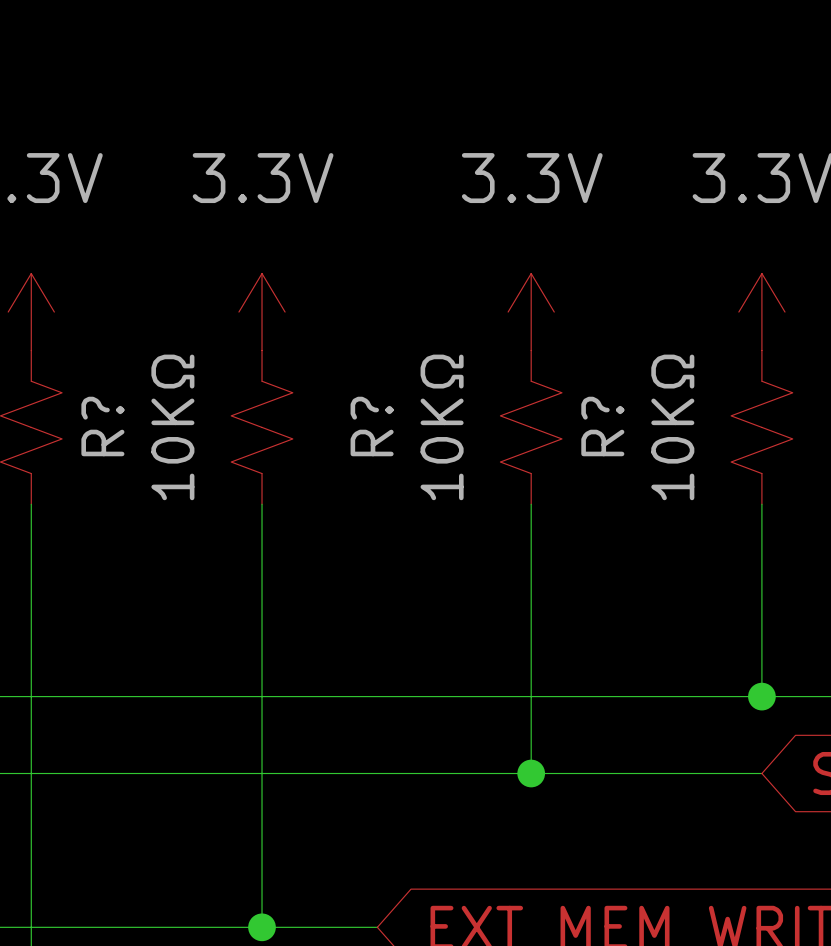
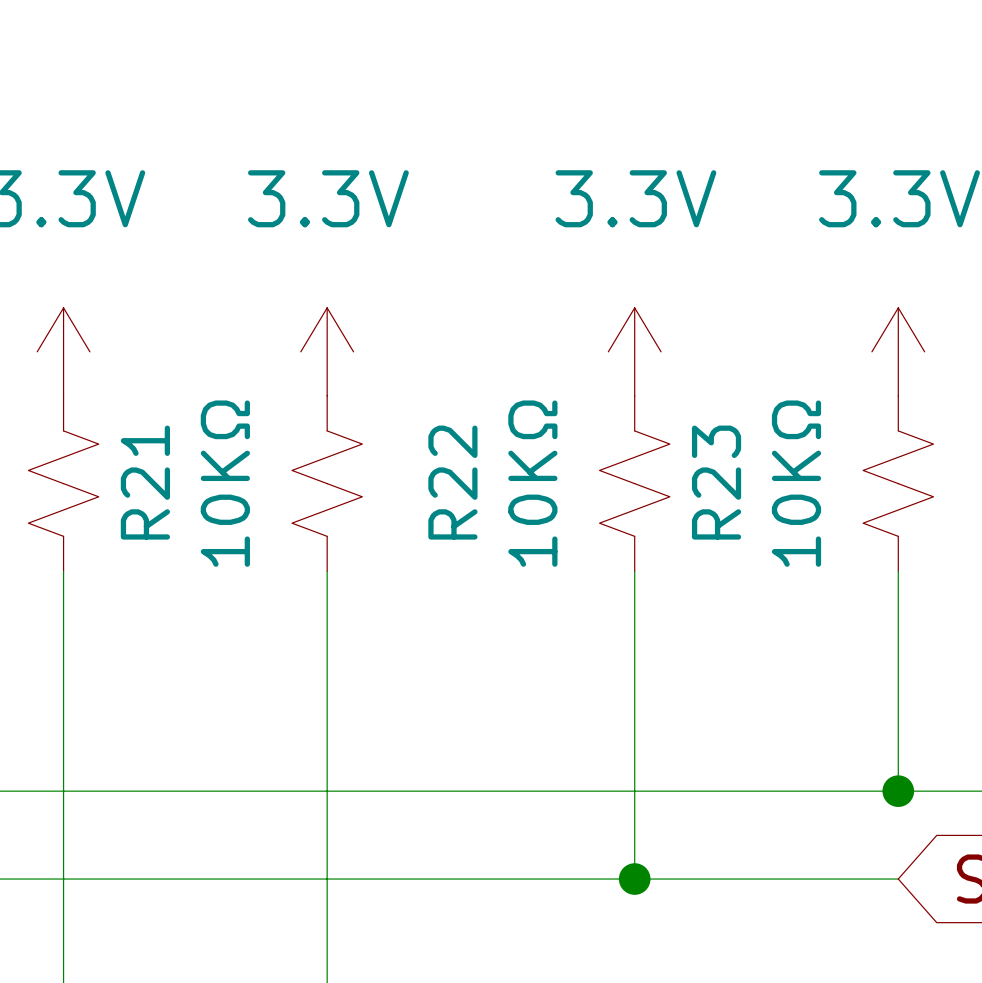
R? name: R? (102, 426) -> R21 (145, 482)
R? name: R? (372, 426) -> R22 (452, 482)
R? name: R? (602, 426) -> R23 (716, 482)

